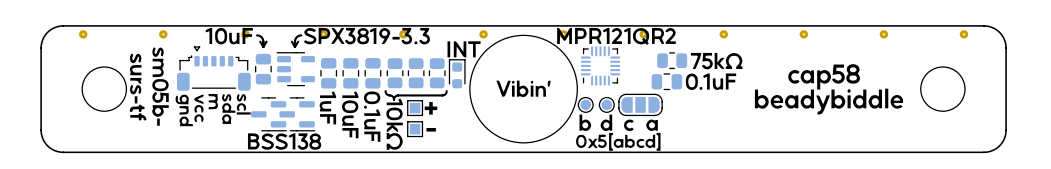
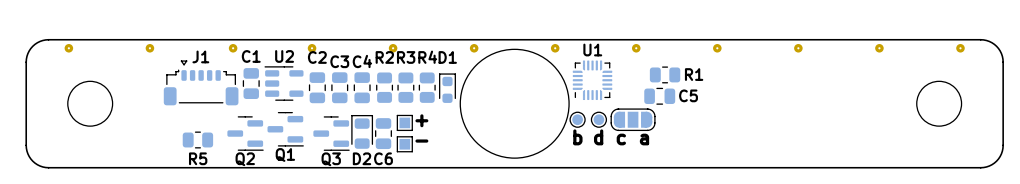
drawing: [129, 27, 904, 151] -> none
line: (257, 35) (262, 38) (263, 46) -> none
line: (301, 35) (295, 38) (294, 46) -> none
U1 name: none -> U1 (592, 50)
line: (260, 41) (263, 46) -> none
line: (266, 41) (263, 46) -> none
line: (291, 41) (294, 46) -> none
line: (298, 41) (294, 46) -> none
J1 name: none -> J1 (200, 56)
C1 name: none -> C1 (251, 56)
U2 name: none -> U2 (284, 56)
C2 name: none -> C2 (317, 57)
R2 name: none -> R2 (384, 57)
R3 name: none -> R3 (406, 57)
R4 name: none -> R4 (427, 57)
D1 name: none -> D1 (447, 57)
C3 name: none -> C3 (339, 61)
C4 name: none -> C4 (362, 61)
R1 name: none -> R1 (694, 74)
C5 name: none -> C5 (688, 95)
line: (446, 91) (442, 95) (397, 95) (394, 99) (385, 91) -> none
part value: none -> + (421, 120)
part: (268, 114) -> none
D2: none -> (362, 131)
Q2: none -> (245, 133)
Q3: none -> (331, 133)
C6: none -> (383, 133)
part value: none -> b (577, 137)
part value: none -> d (598, 137)
R5: none -> (197, 140)
part text: none -> c (621, 139)
part text: none -> a (644, 139)
part value: none -> - (421, 141)
Q1 name: none -> Q1 (285, 154)

